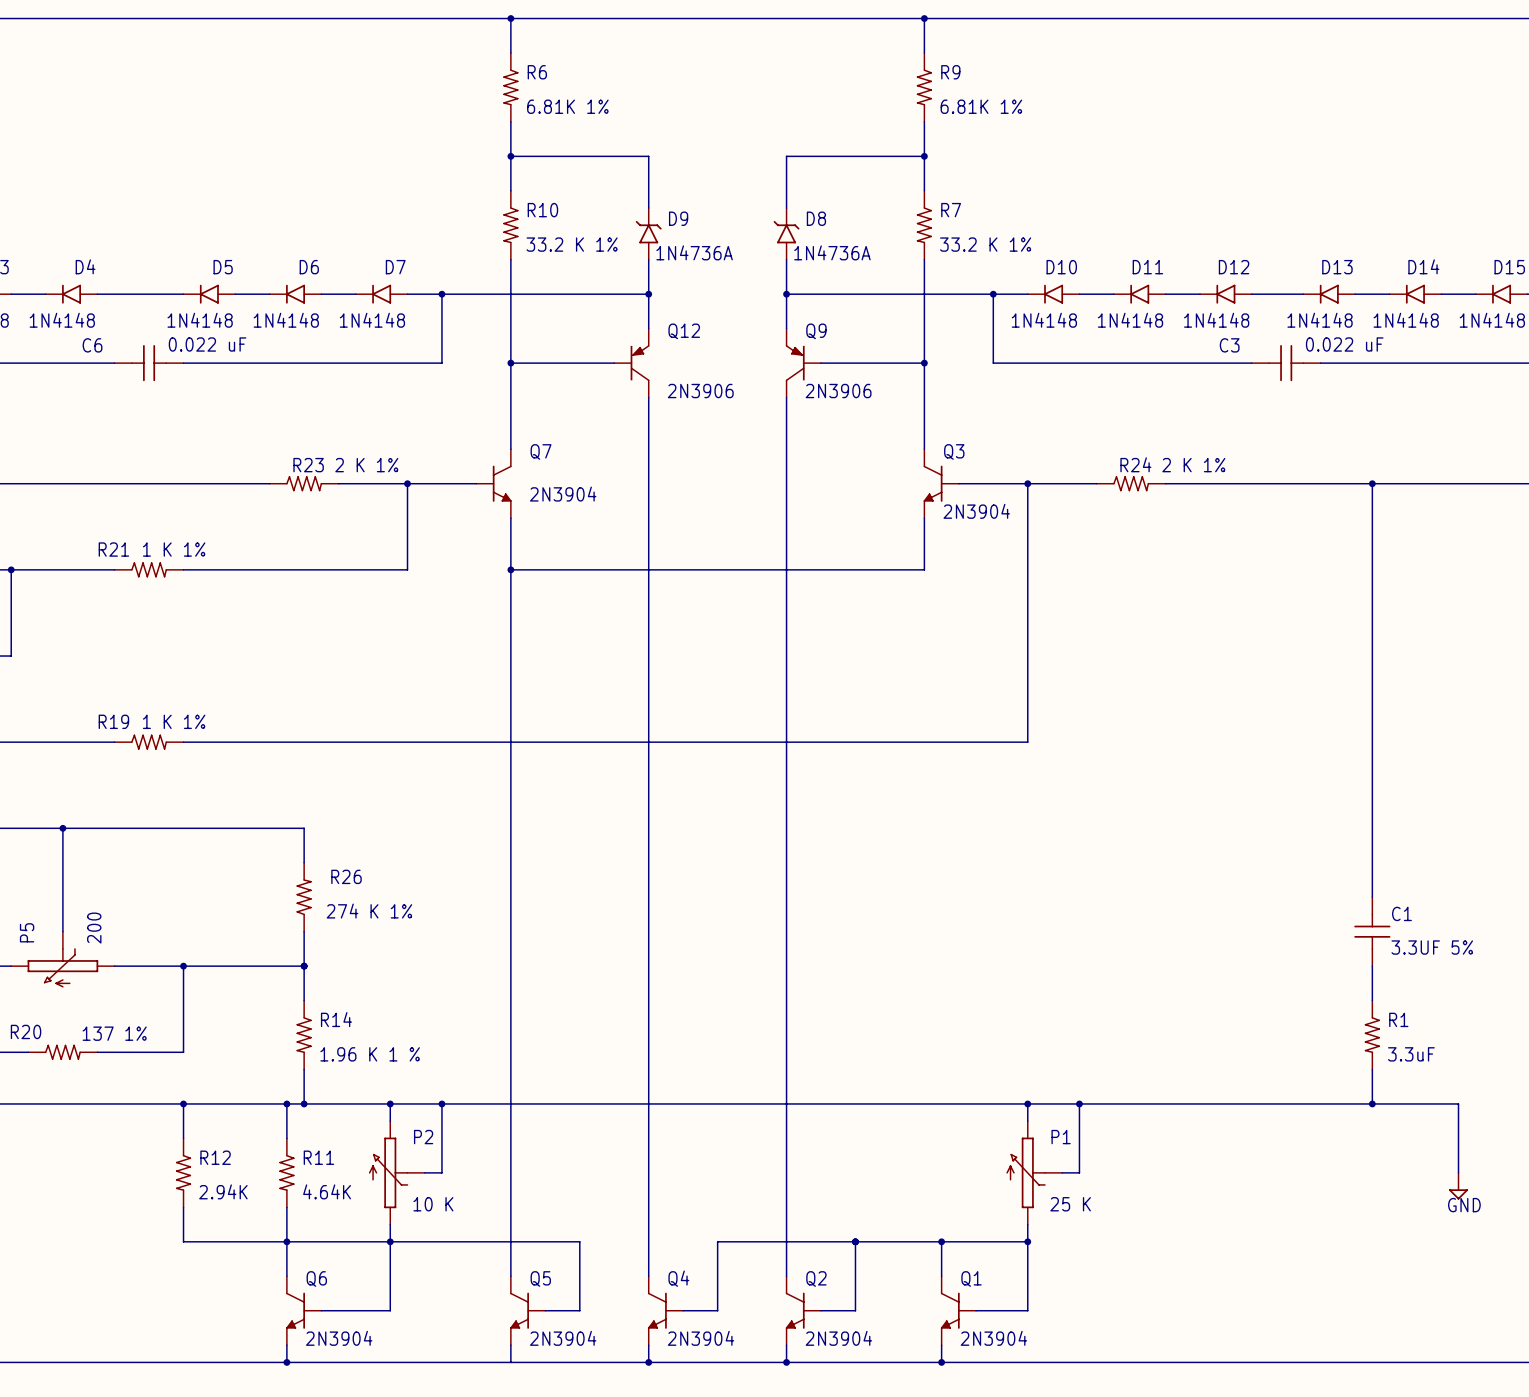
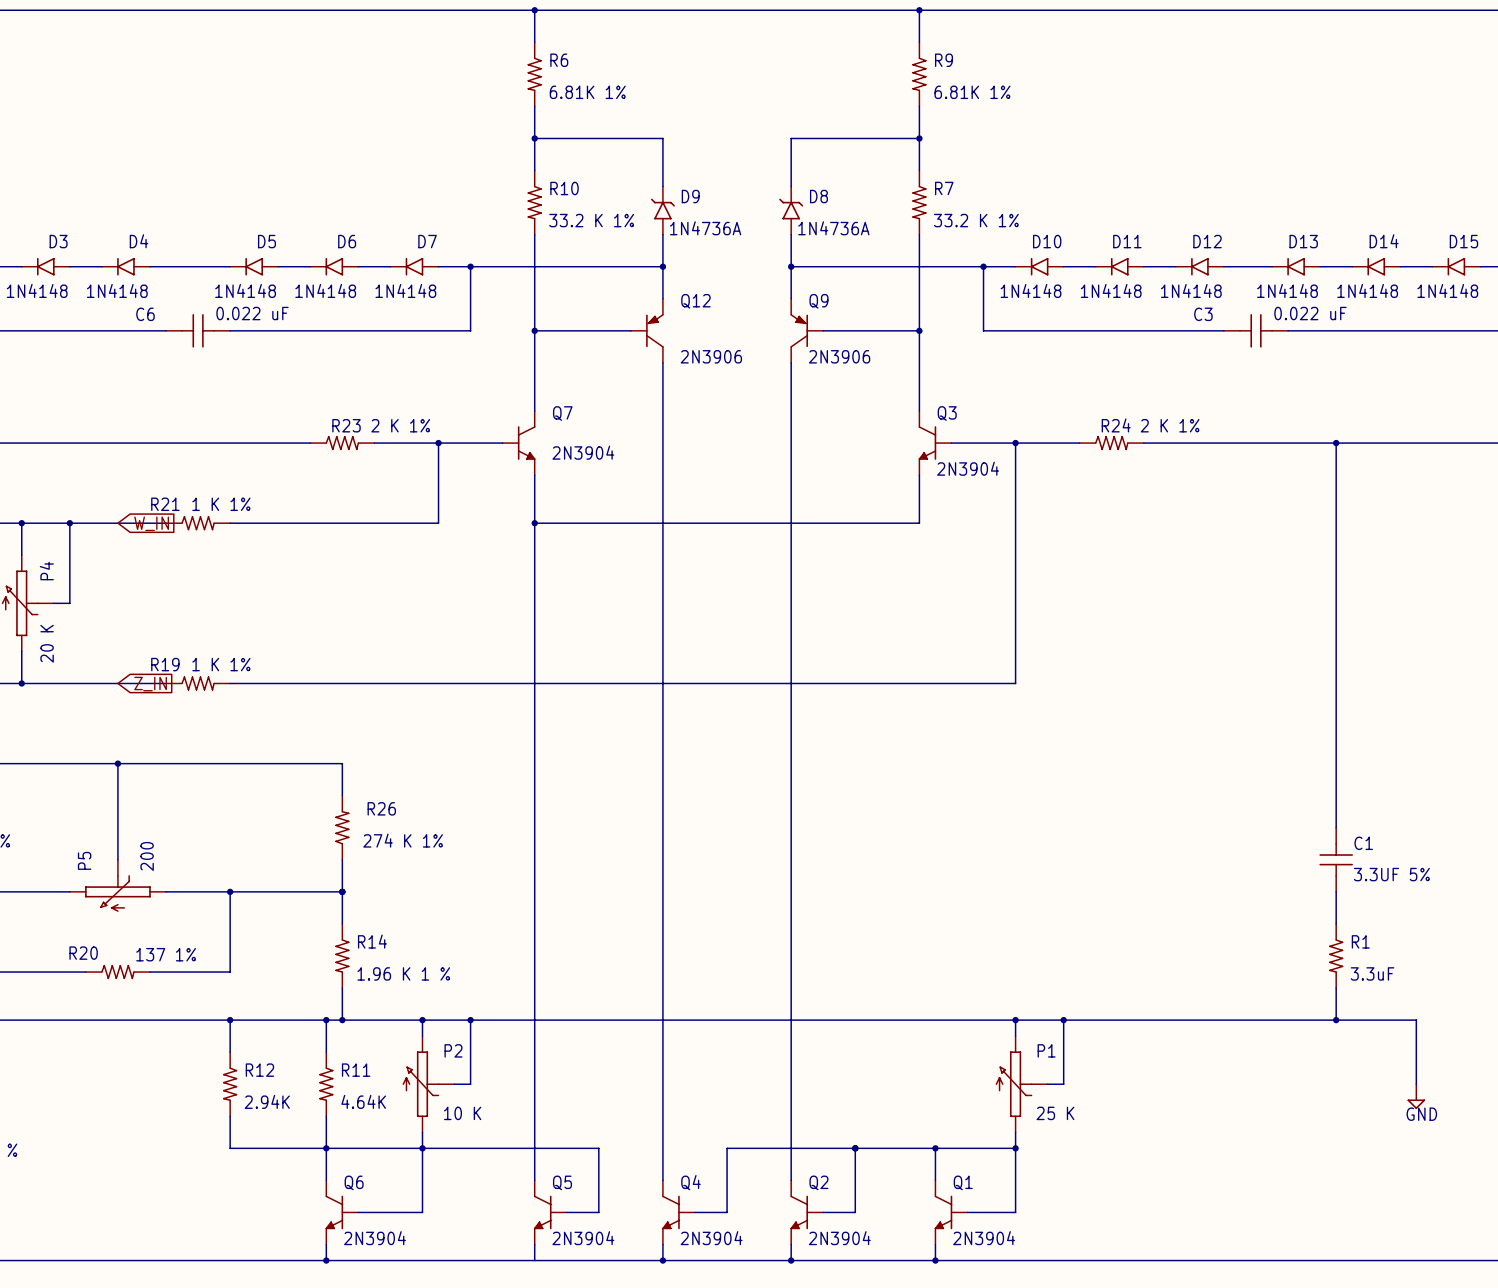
global label: none -> W_IN (151, 523)
global label: none -> Z_IN (150, 684)

